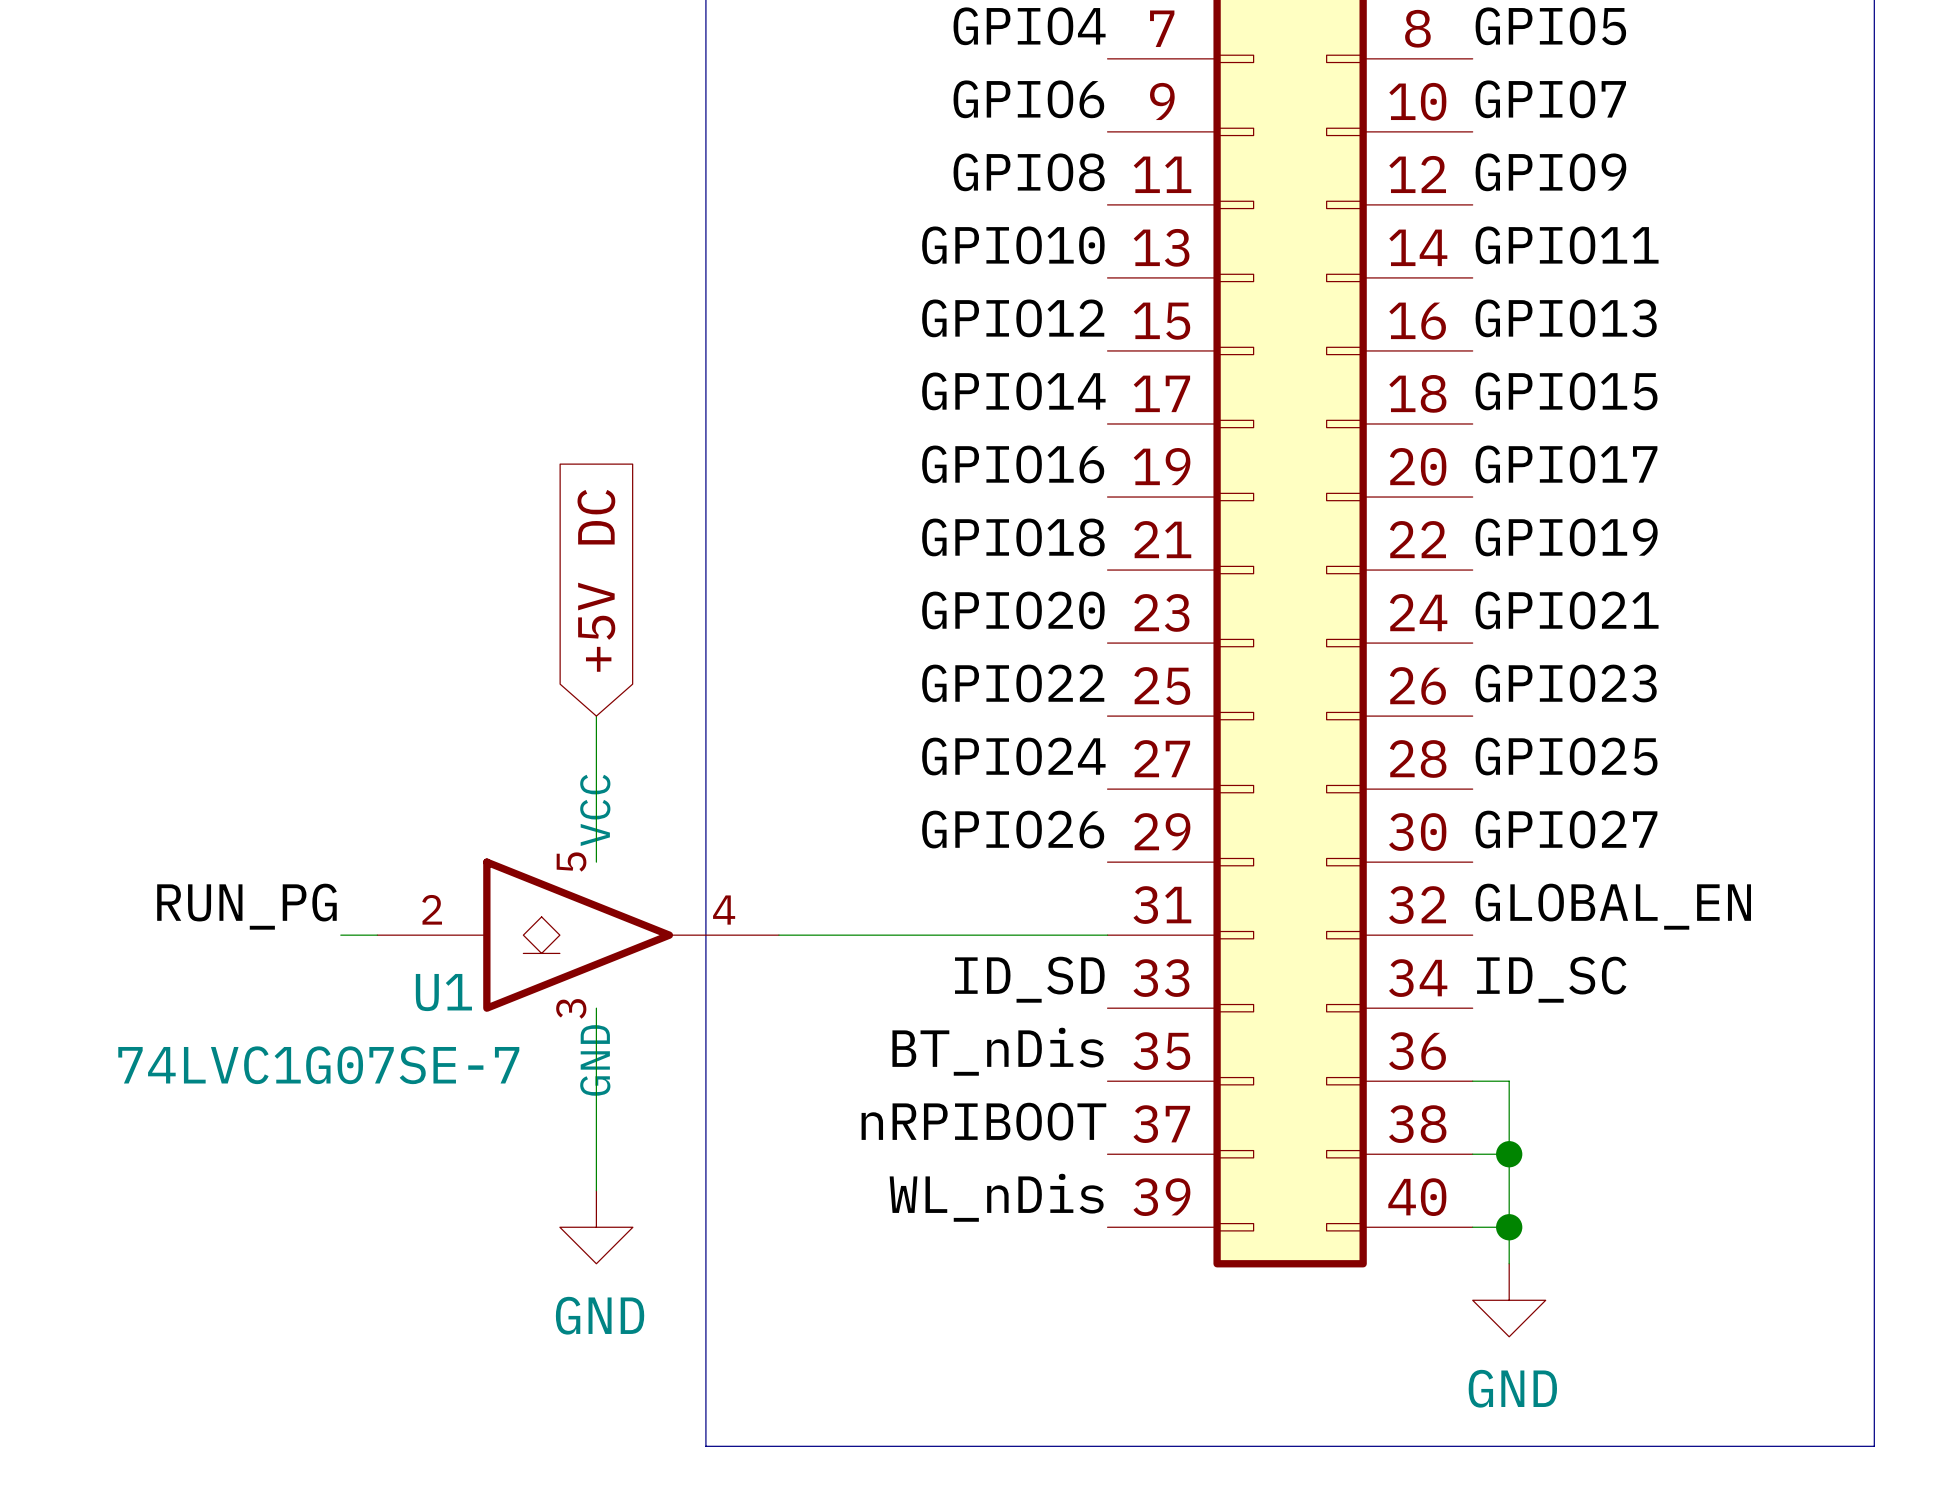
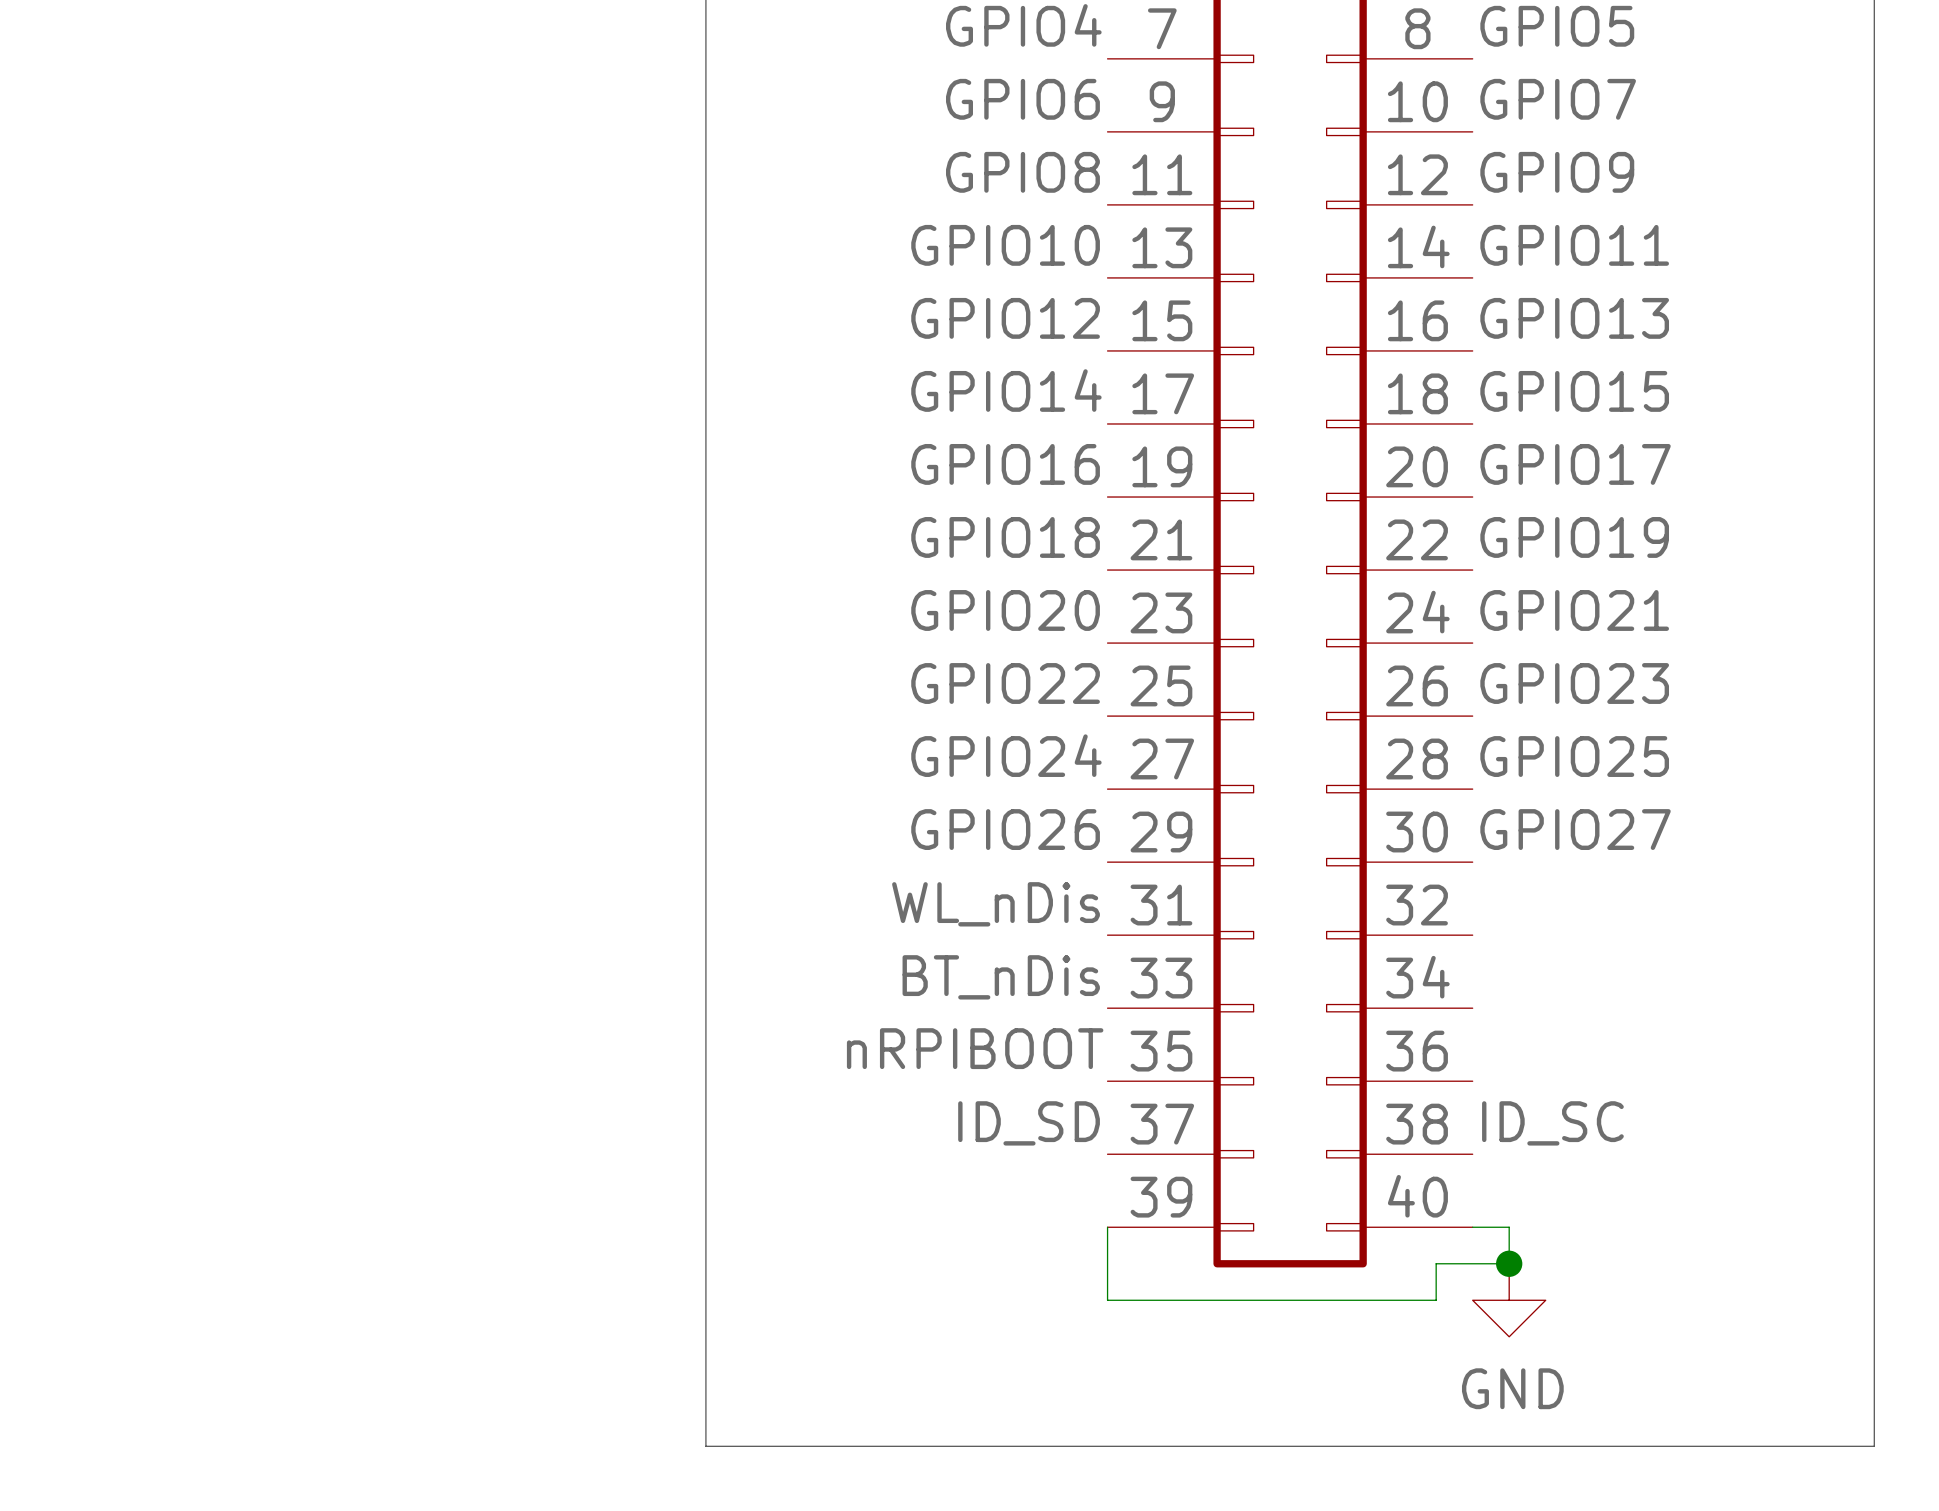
global label: +5V DC (596, 580) -> none
wire: (596, 716) (596, 862) -> none
label: RUN_PG (246, 906) -> none
label: GLOBAL_EN (1613, 906) -> none
wire: (340, 935) (377, 935) -> none
U1: 74LVC1G07SE-7 (578, 935) -> none
wire: (778, 935) (1107, 935) -> none
label: ID_SD (1029, 979) -> BT_nDis (1001, 977)
label position: ID_SC (1551, 979) -> ID_SC (1552, 1123)
wire: (596, 1008) (596, 1190) -> none
label: BT_nDis (998, 1051) -> nRPIBOOT (975, 1048)
wire: (1472, 1081) (1509, 1081) (1509, 1227) -> none
label: nRPIBOOT (983, 1121) -> ID_SD (1029, 1123)
wire: (1472, 1154) (1509, 1154) -> none
junction: (1509, 1154) -> none
label position: WL_nDis (996, 1197) -> WL_nDis (996, 904)
power symbol: GND (596, 1227) -> none
wire: none -> (1107, 1227) (1107, 1300) (1436, 1300) (1436, 1263) (1509, 1263)
junction position: (1509, 1227) -> (1509, 1263)

